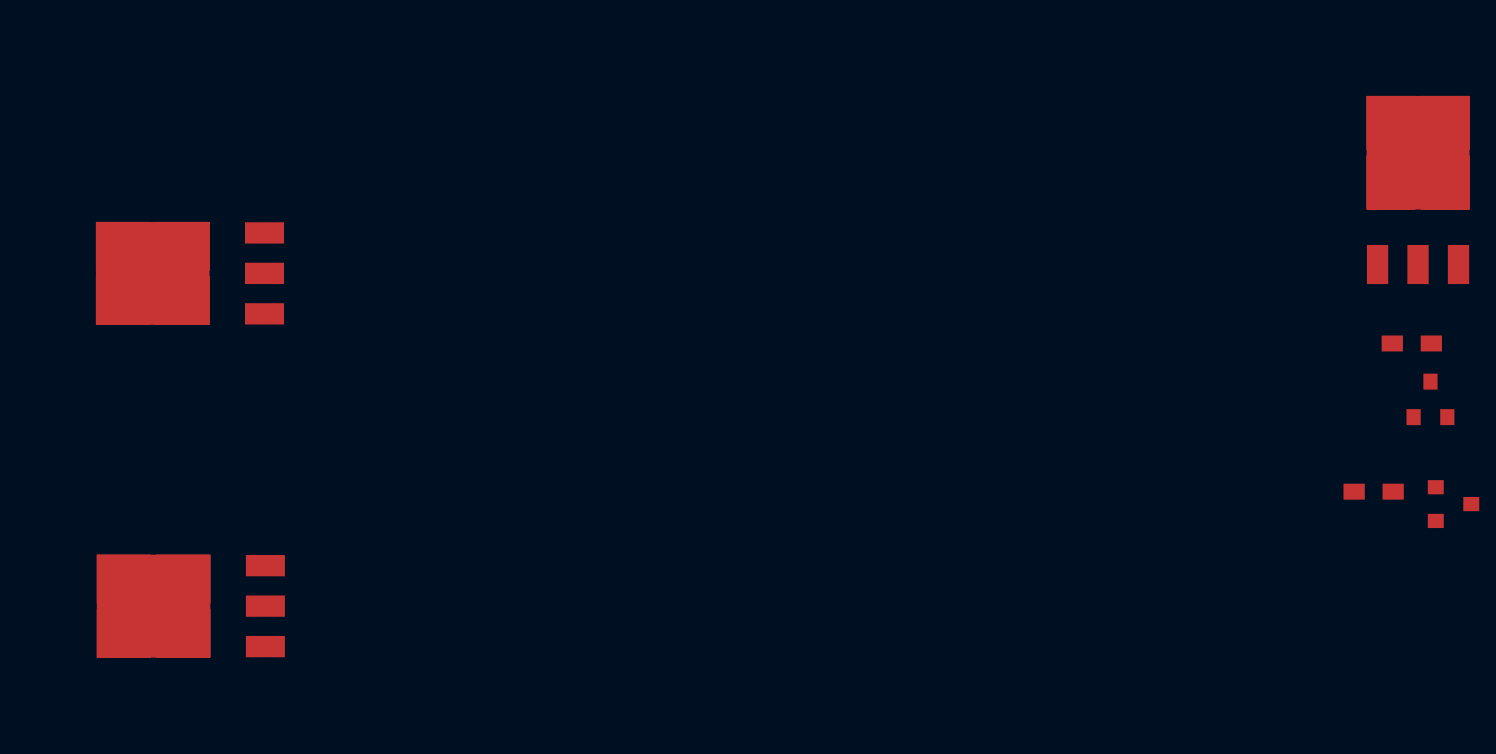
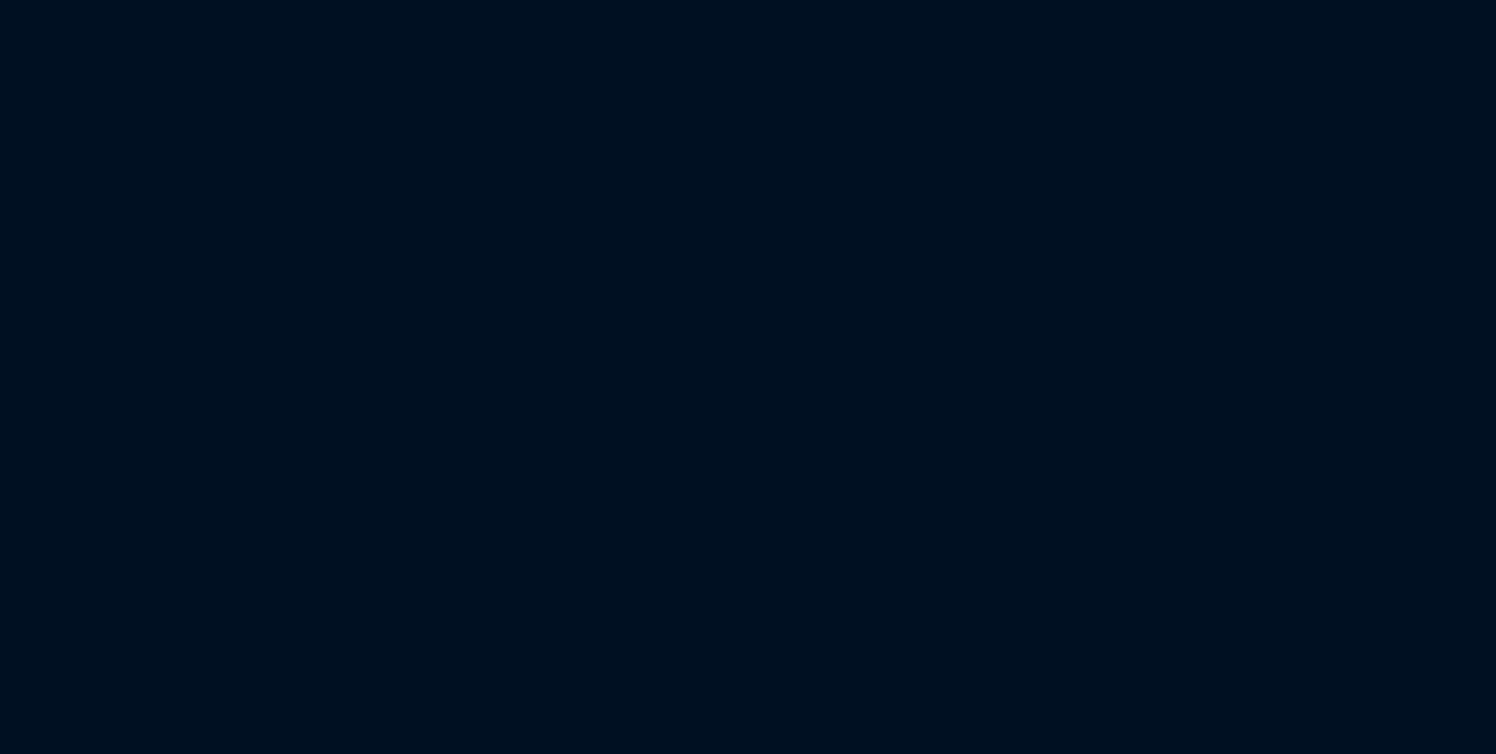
part: (1418, 189) -> none
part: (189, 273) -> none
part: (1411, 343) -> none
part: (1430, 399) -> none
part: (1373, 491) -> none
part: (1453, 504) -> none
part: (190, 606) -> none

